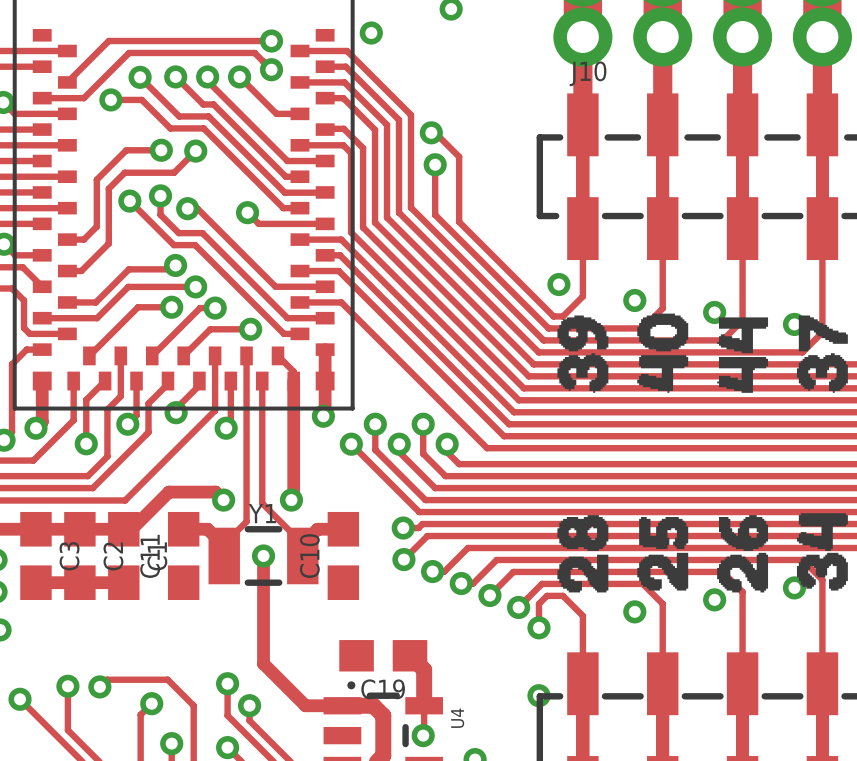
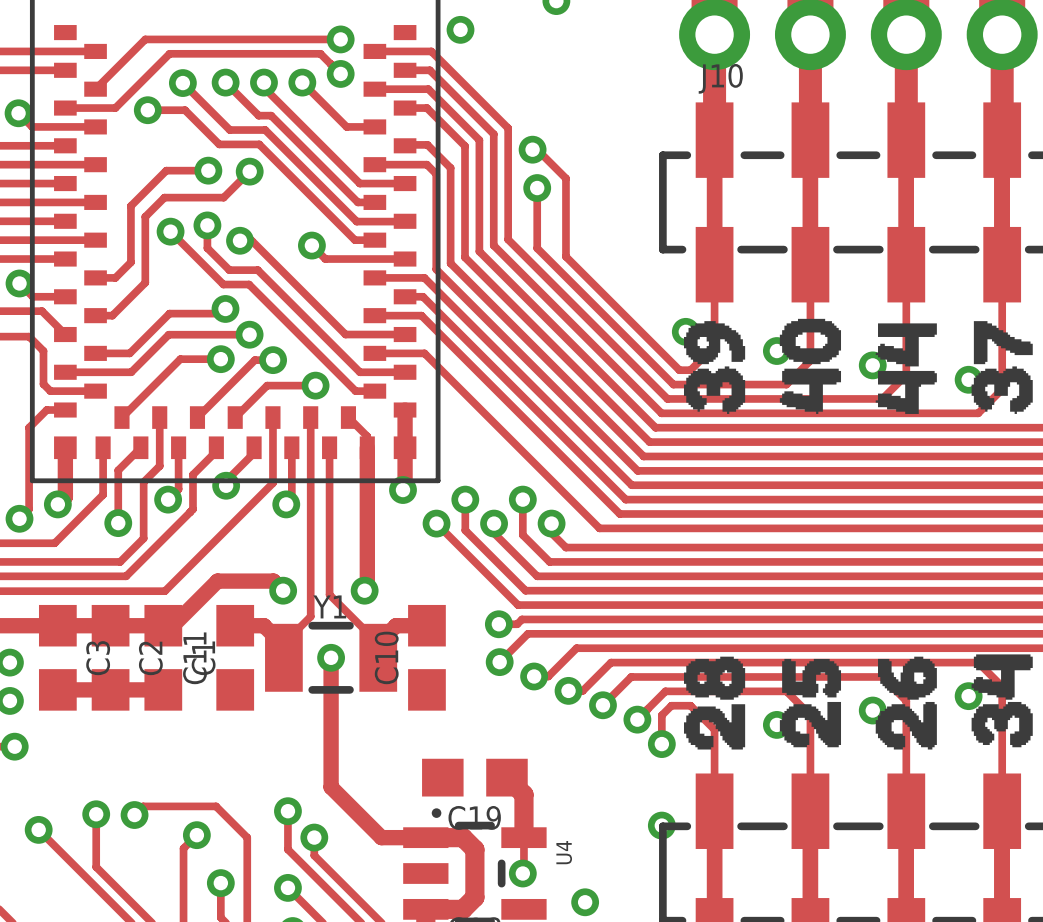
drawing position: (662, 353) -> (810, 366)
drawing position: (582, 354) -> (714, 367)
drawing position: (822, 354) -> (1002, 367)
drawing position: (742, 355) -> (906, 368)
drawing position: (822, 551) -> (1002, 700)
drawing position: (582, 553) -> (714, 703)
drawing position: (662, 553) -> (810, 703)
drawing position: (742, 553) -> (906, 703)

